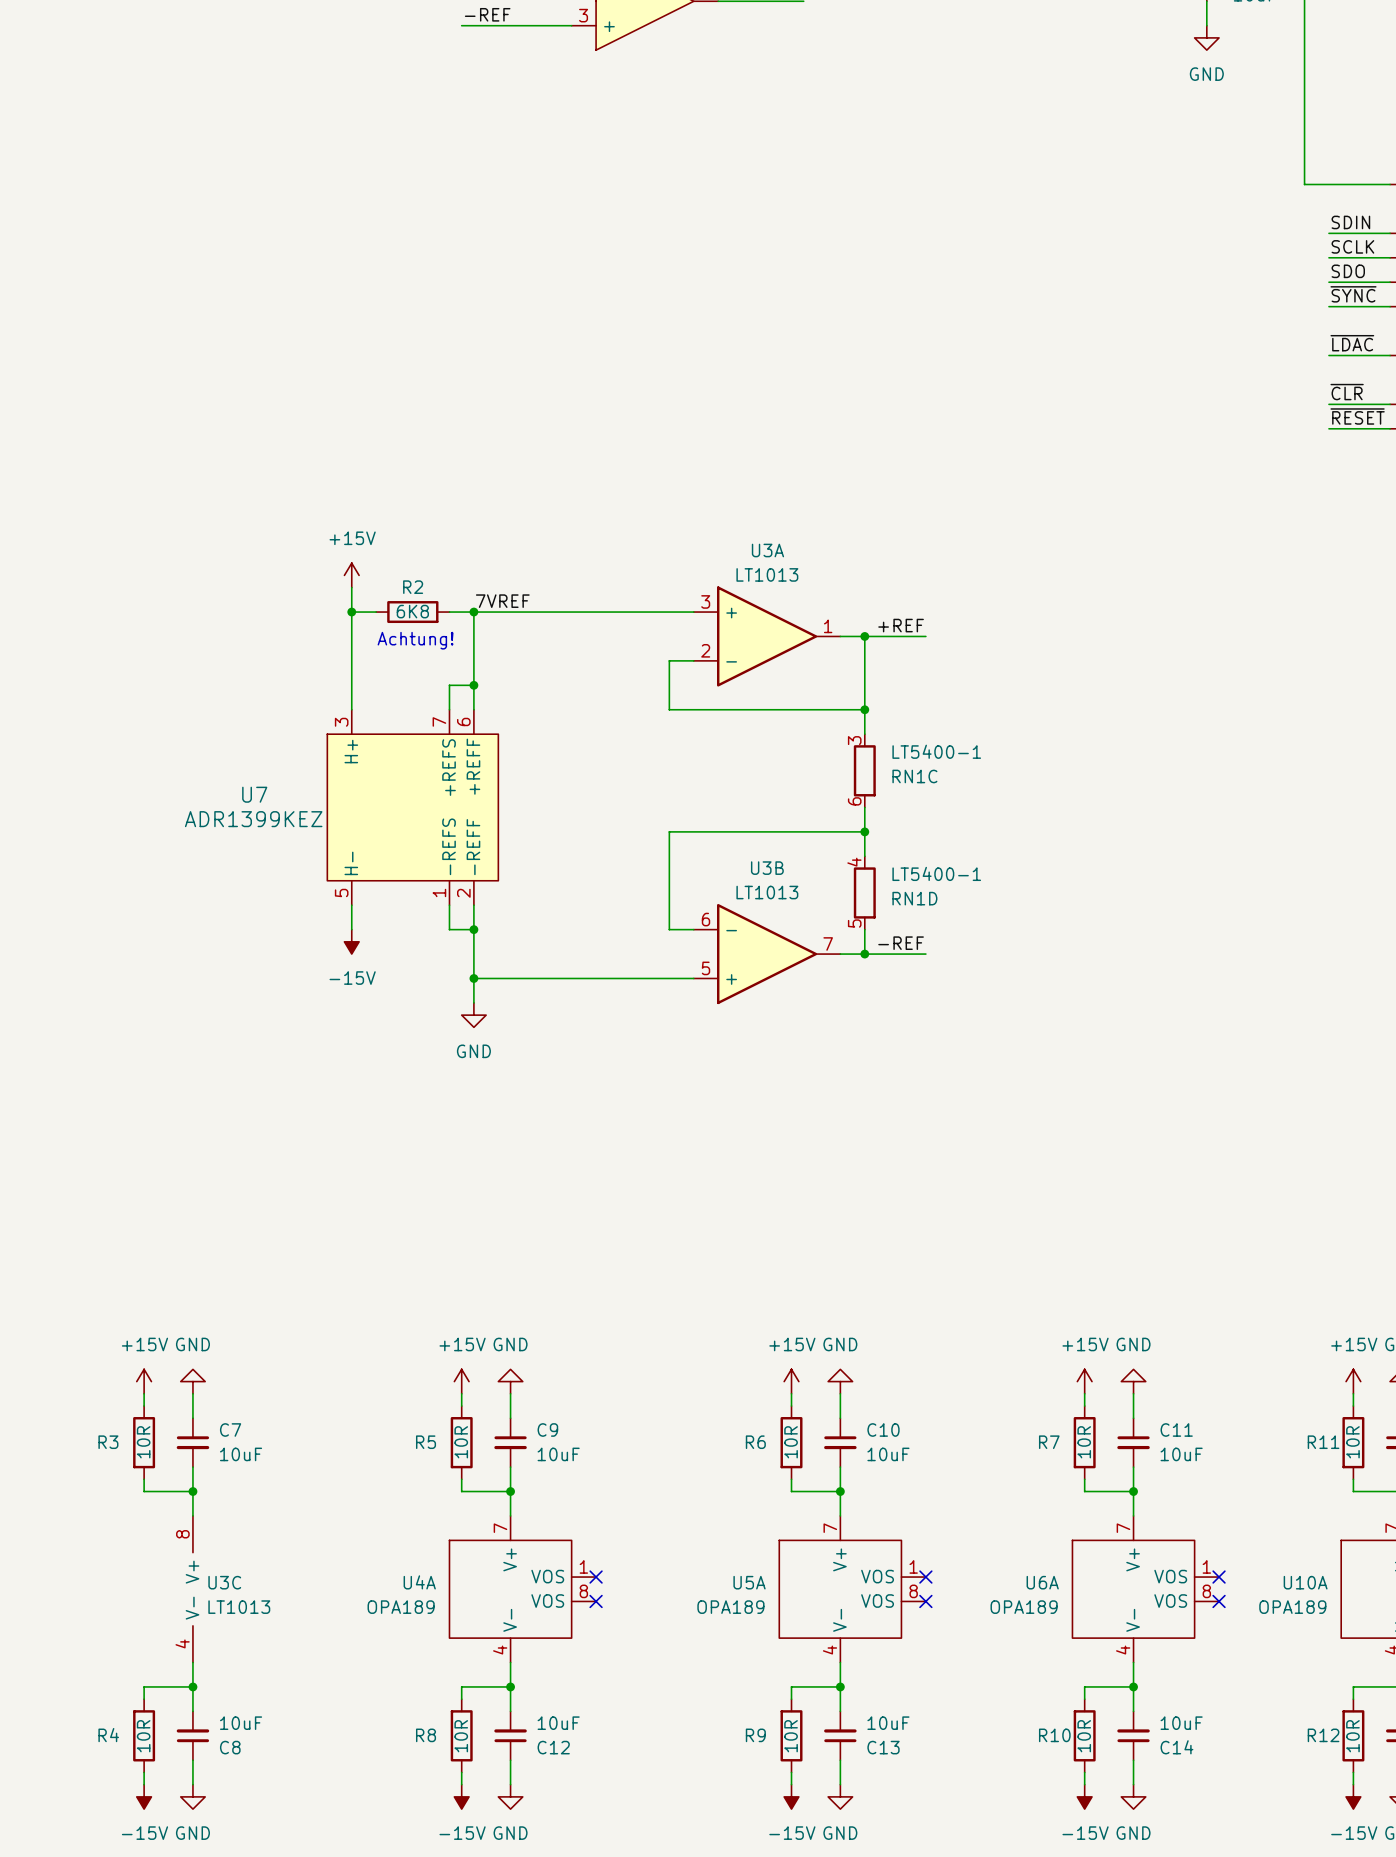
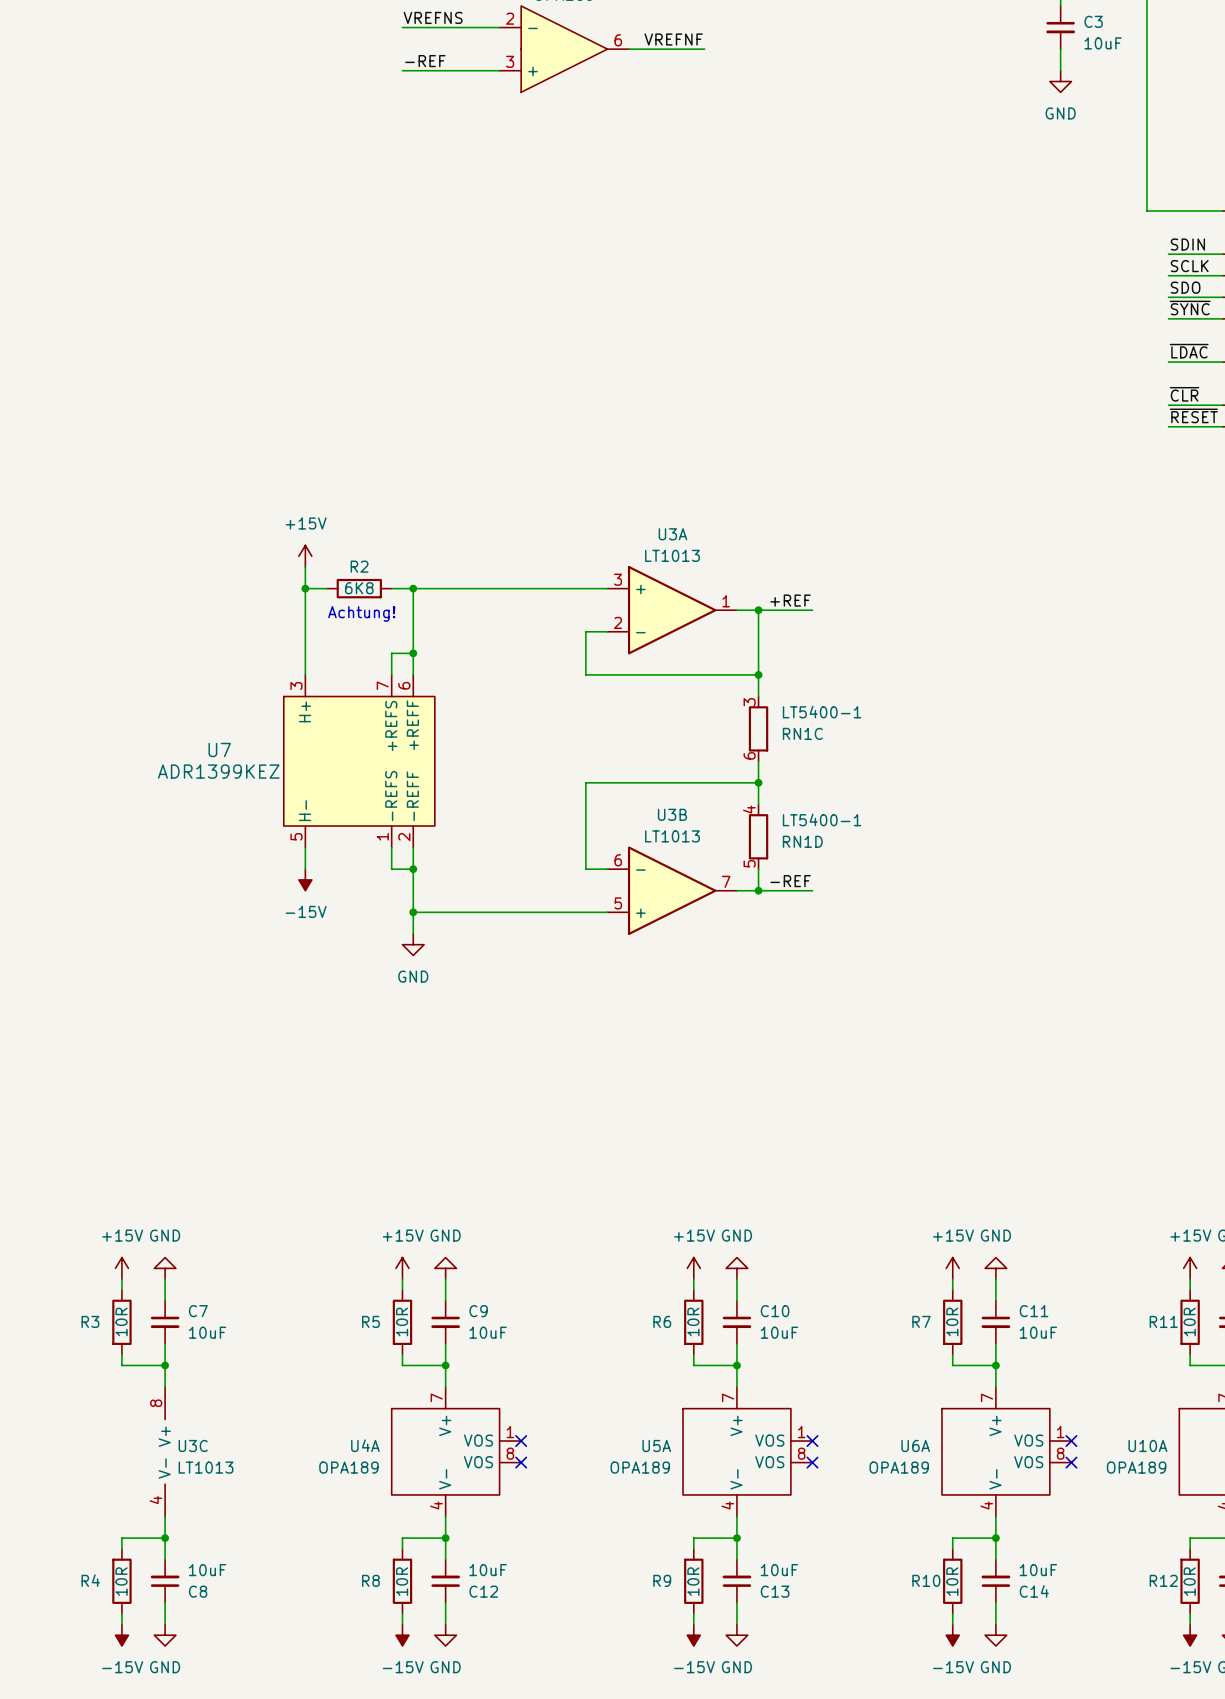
label: 7VREF (502, 601) -> none

